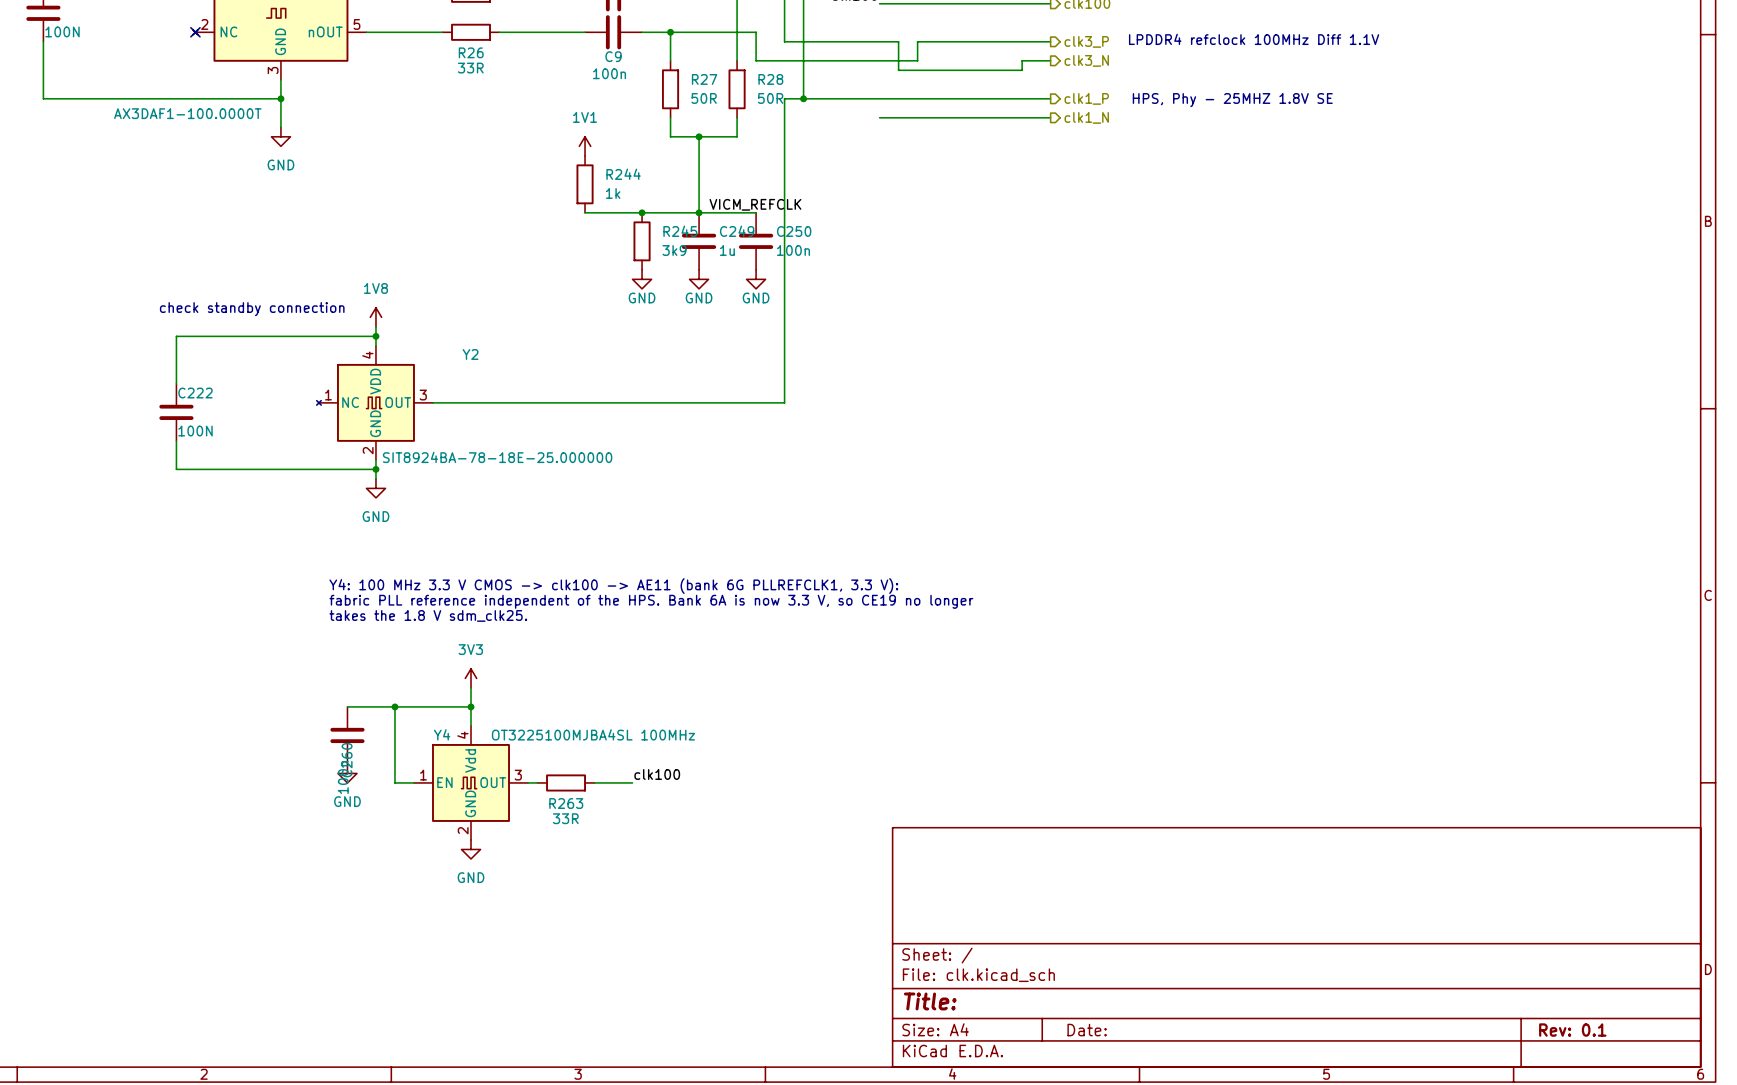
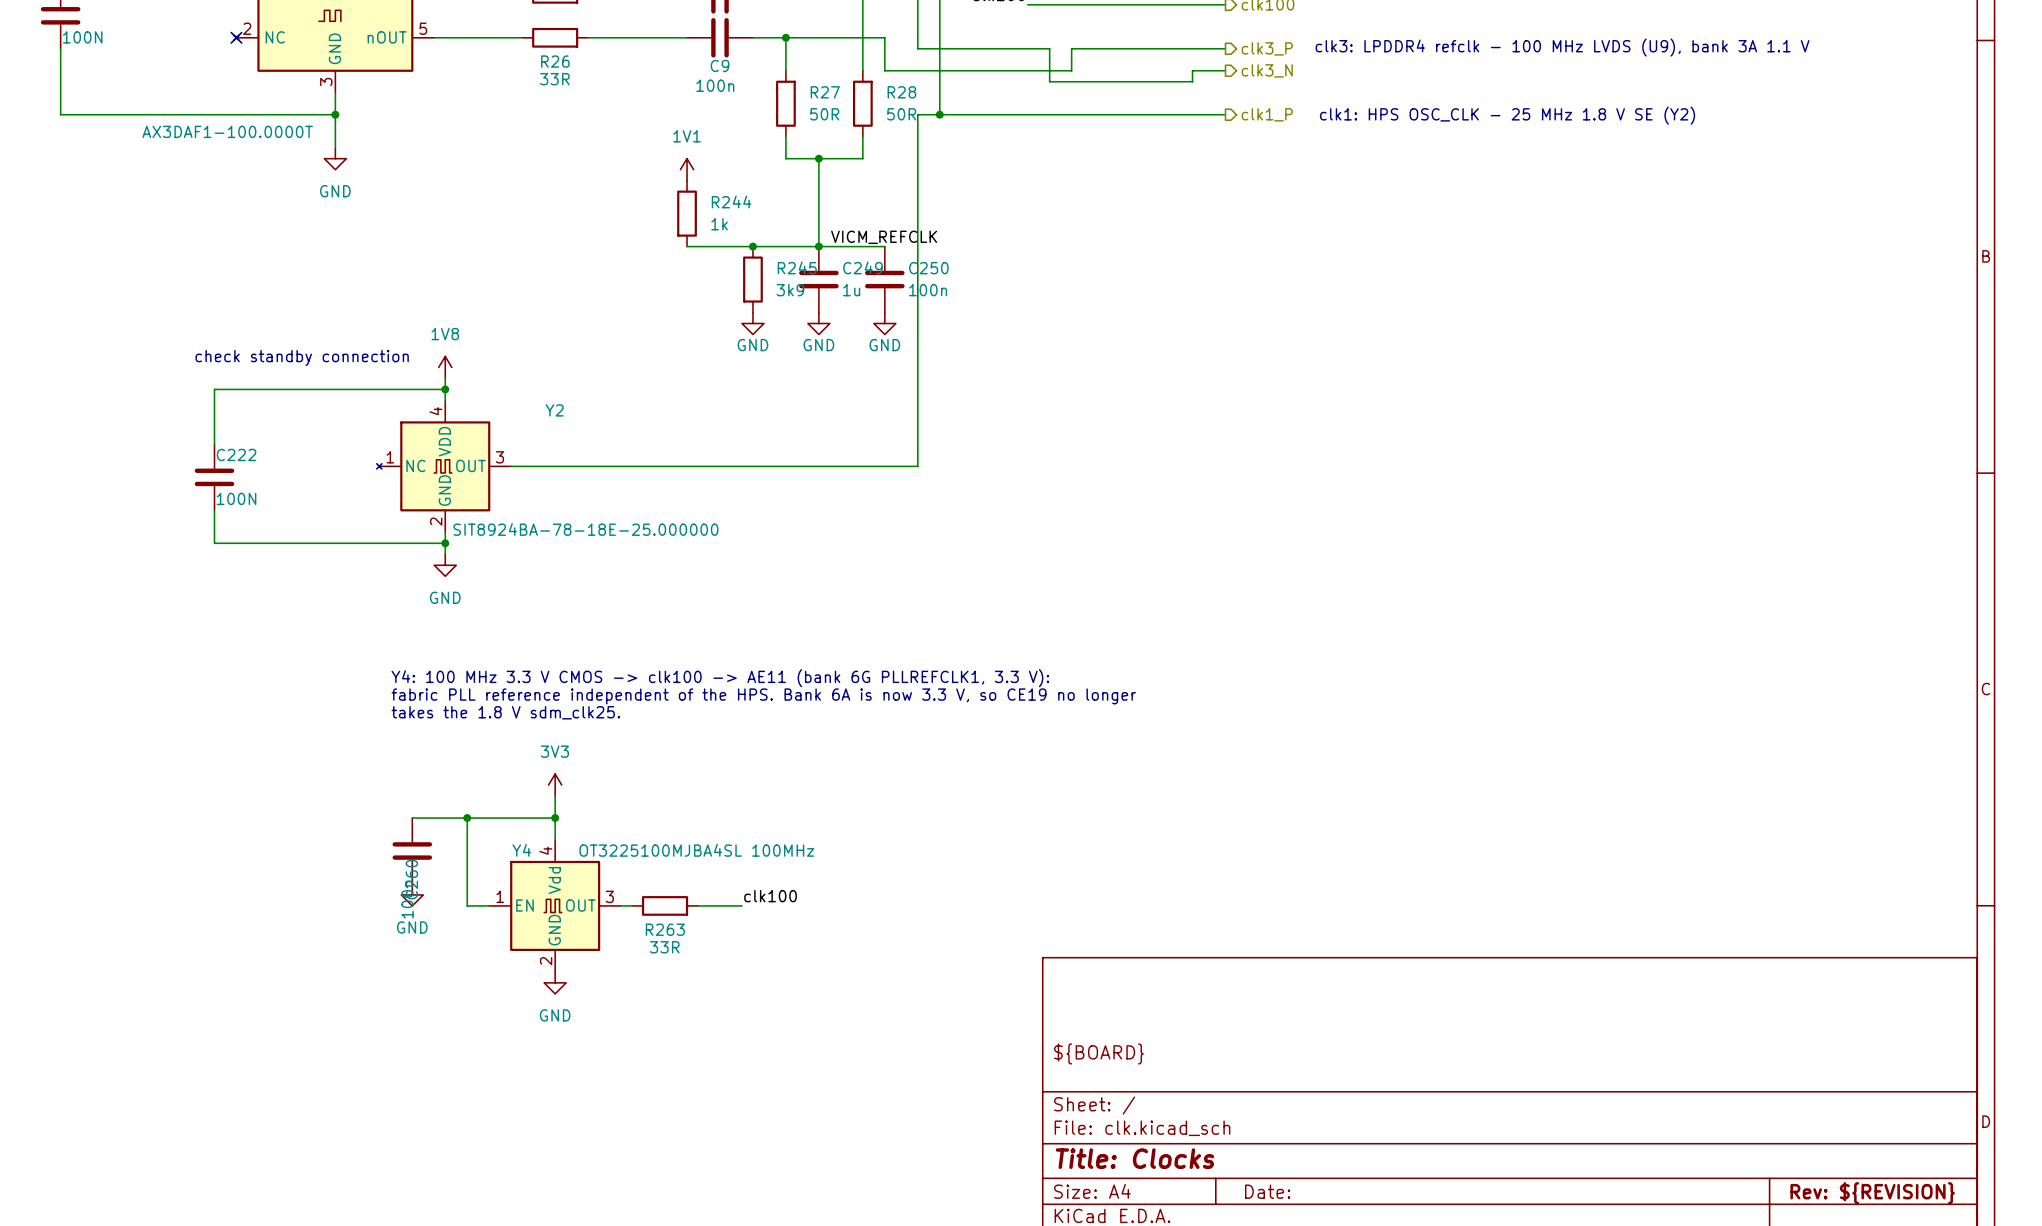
text: LPDDR4 refclock 100MHz Diff 1.1V (1254, 39) -> clk3: LPDDR4 refclk - 100 MHz LVDS (U9), bank 3A 1.1 V (1562, 47)
text: HPS, Phy - 25MHZ 1.8V SE (1232, 100) -> clk1: HPS OSC_CLK - 25 MHz 1.8 V SE (Y2) (1507, 115)
wire: (879, 117) (1050, 117) -> none
hierarchical label: clk1_N (1086, 117) -> none
title block: none -> ${BOARD} (1098, 1053)
title block: Title: (930, 1001) -> Title: Clocks (1134, 1158)
title block: Rev: 0.1 (1572, 1030) -> Rev: ${REVISION} (1872, 1193)

